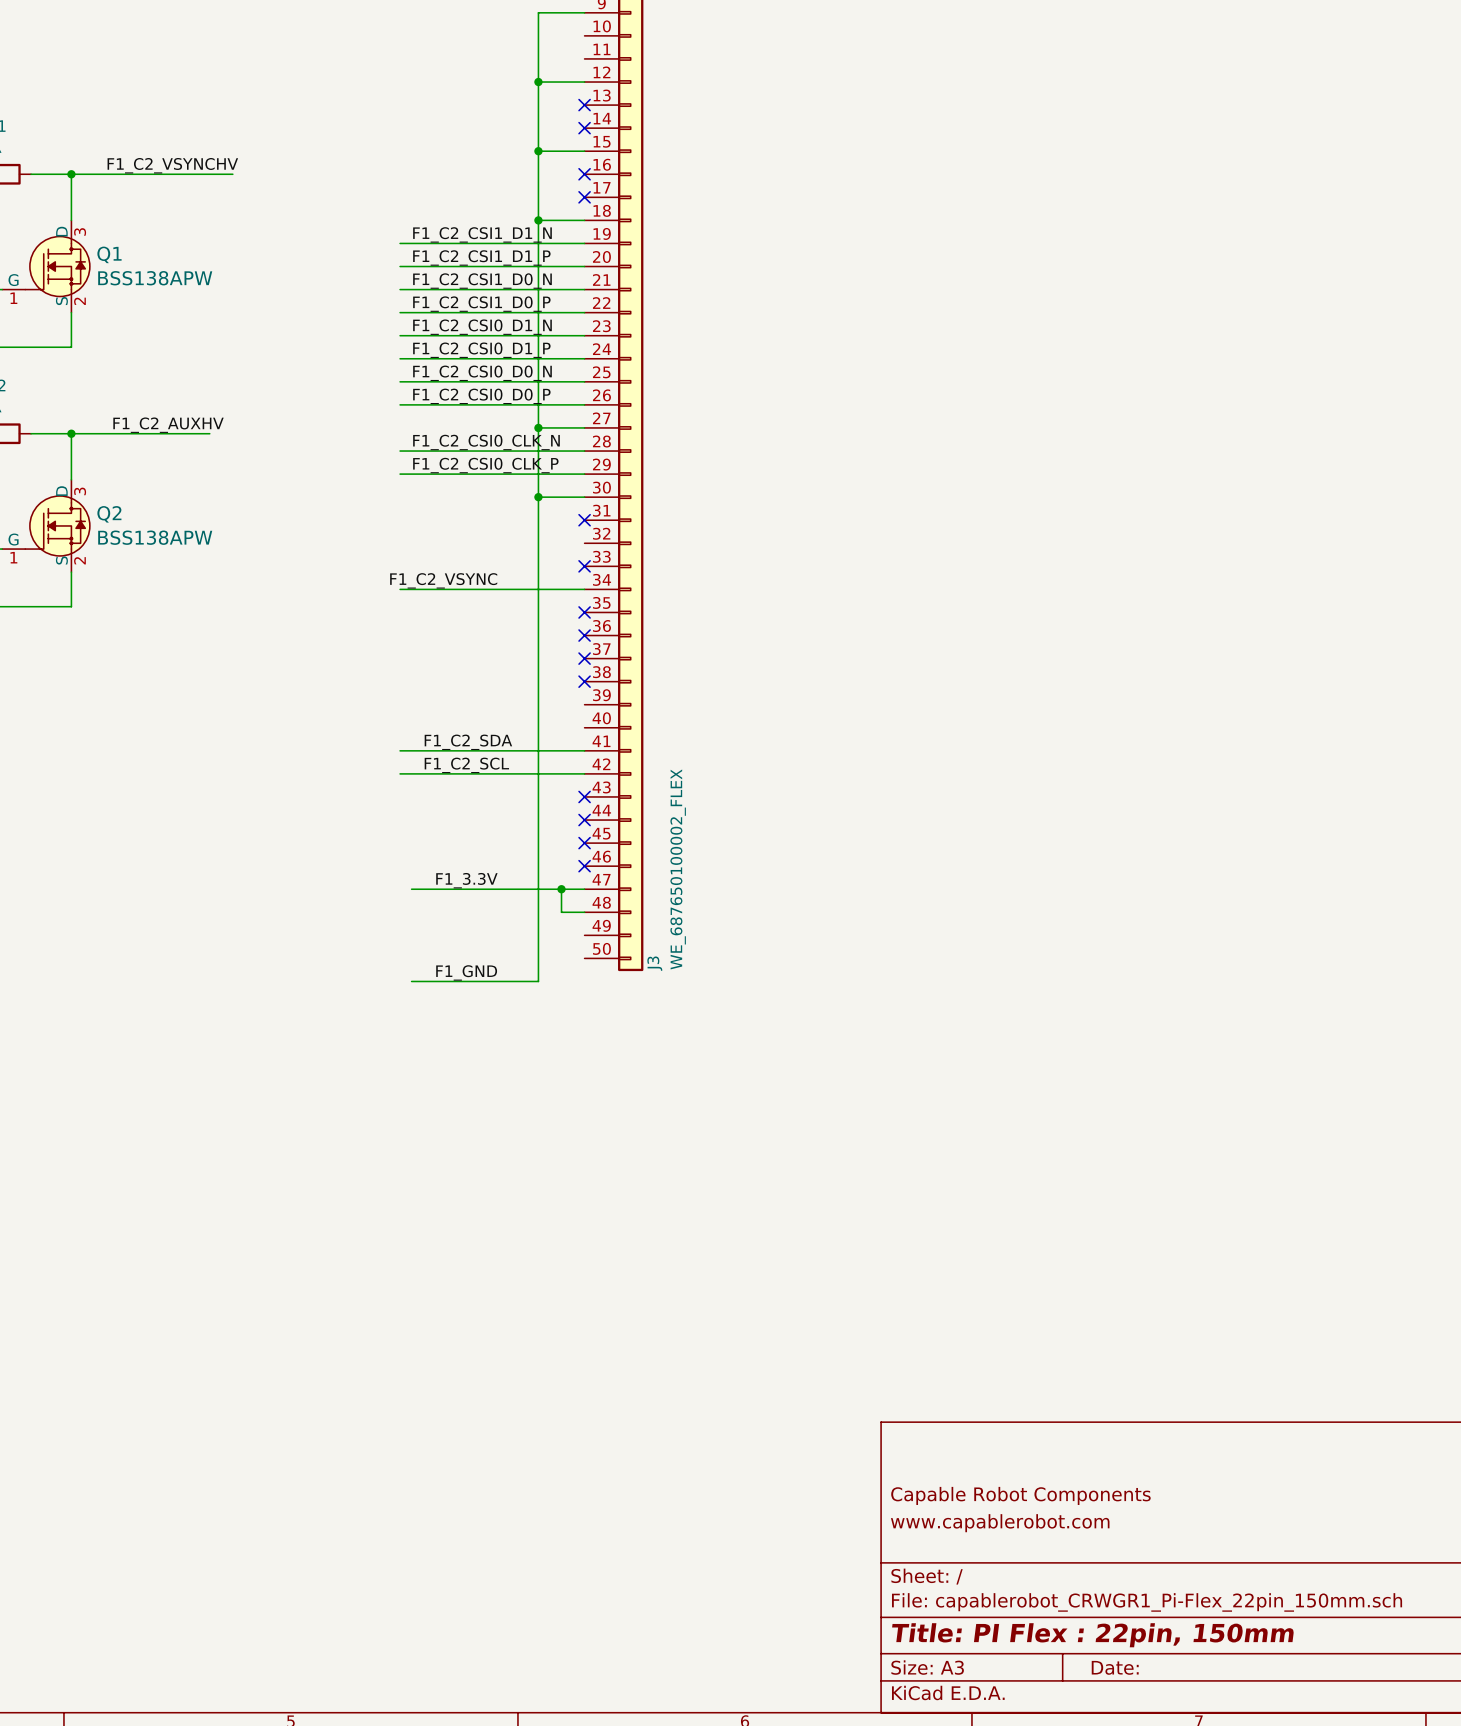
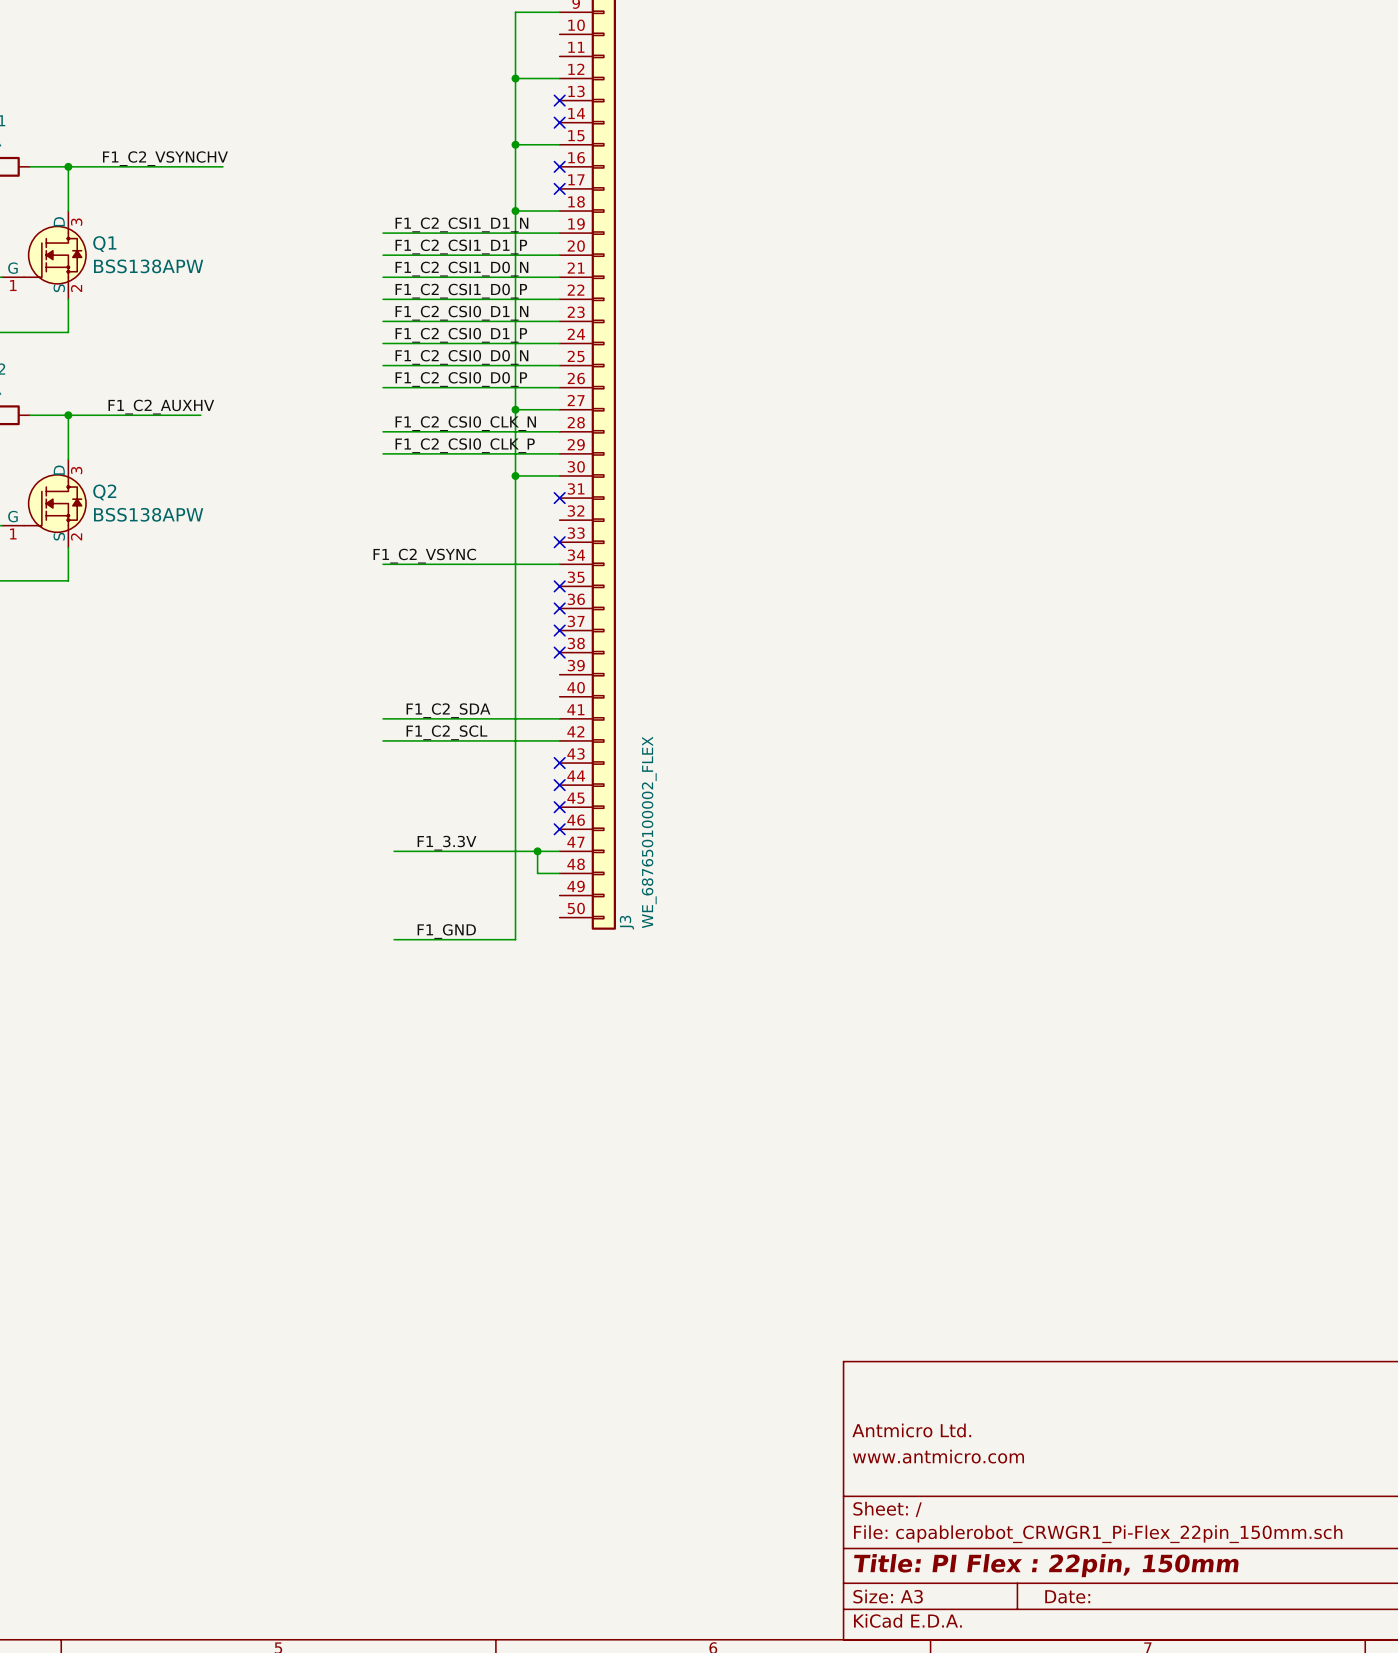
title block: Capable Robot Components (1020, 1495) -> Antmicro Ltd. (911, 1430)
title block: www.capablerobot.com (1000, 1523) -> www.antmicro.com (938, 1456)

